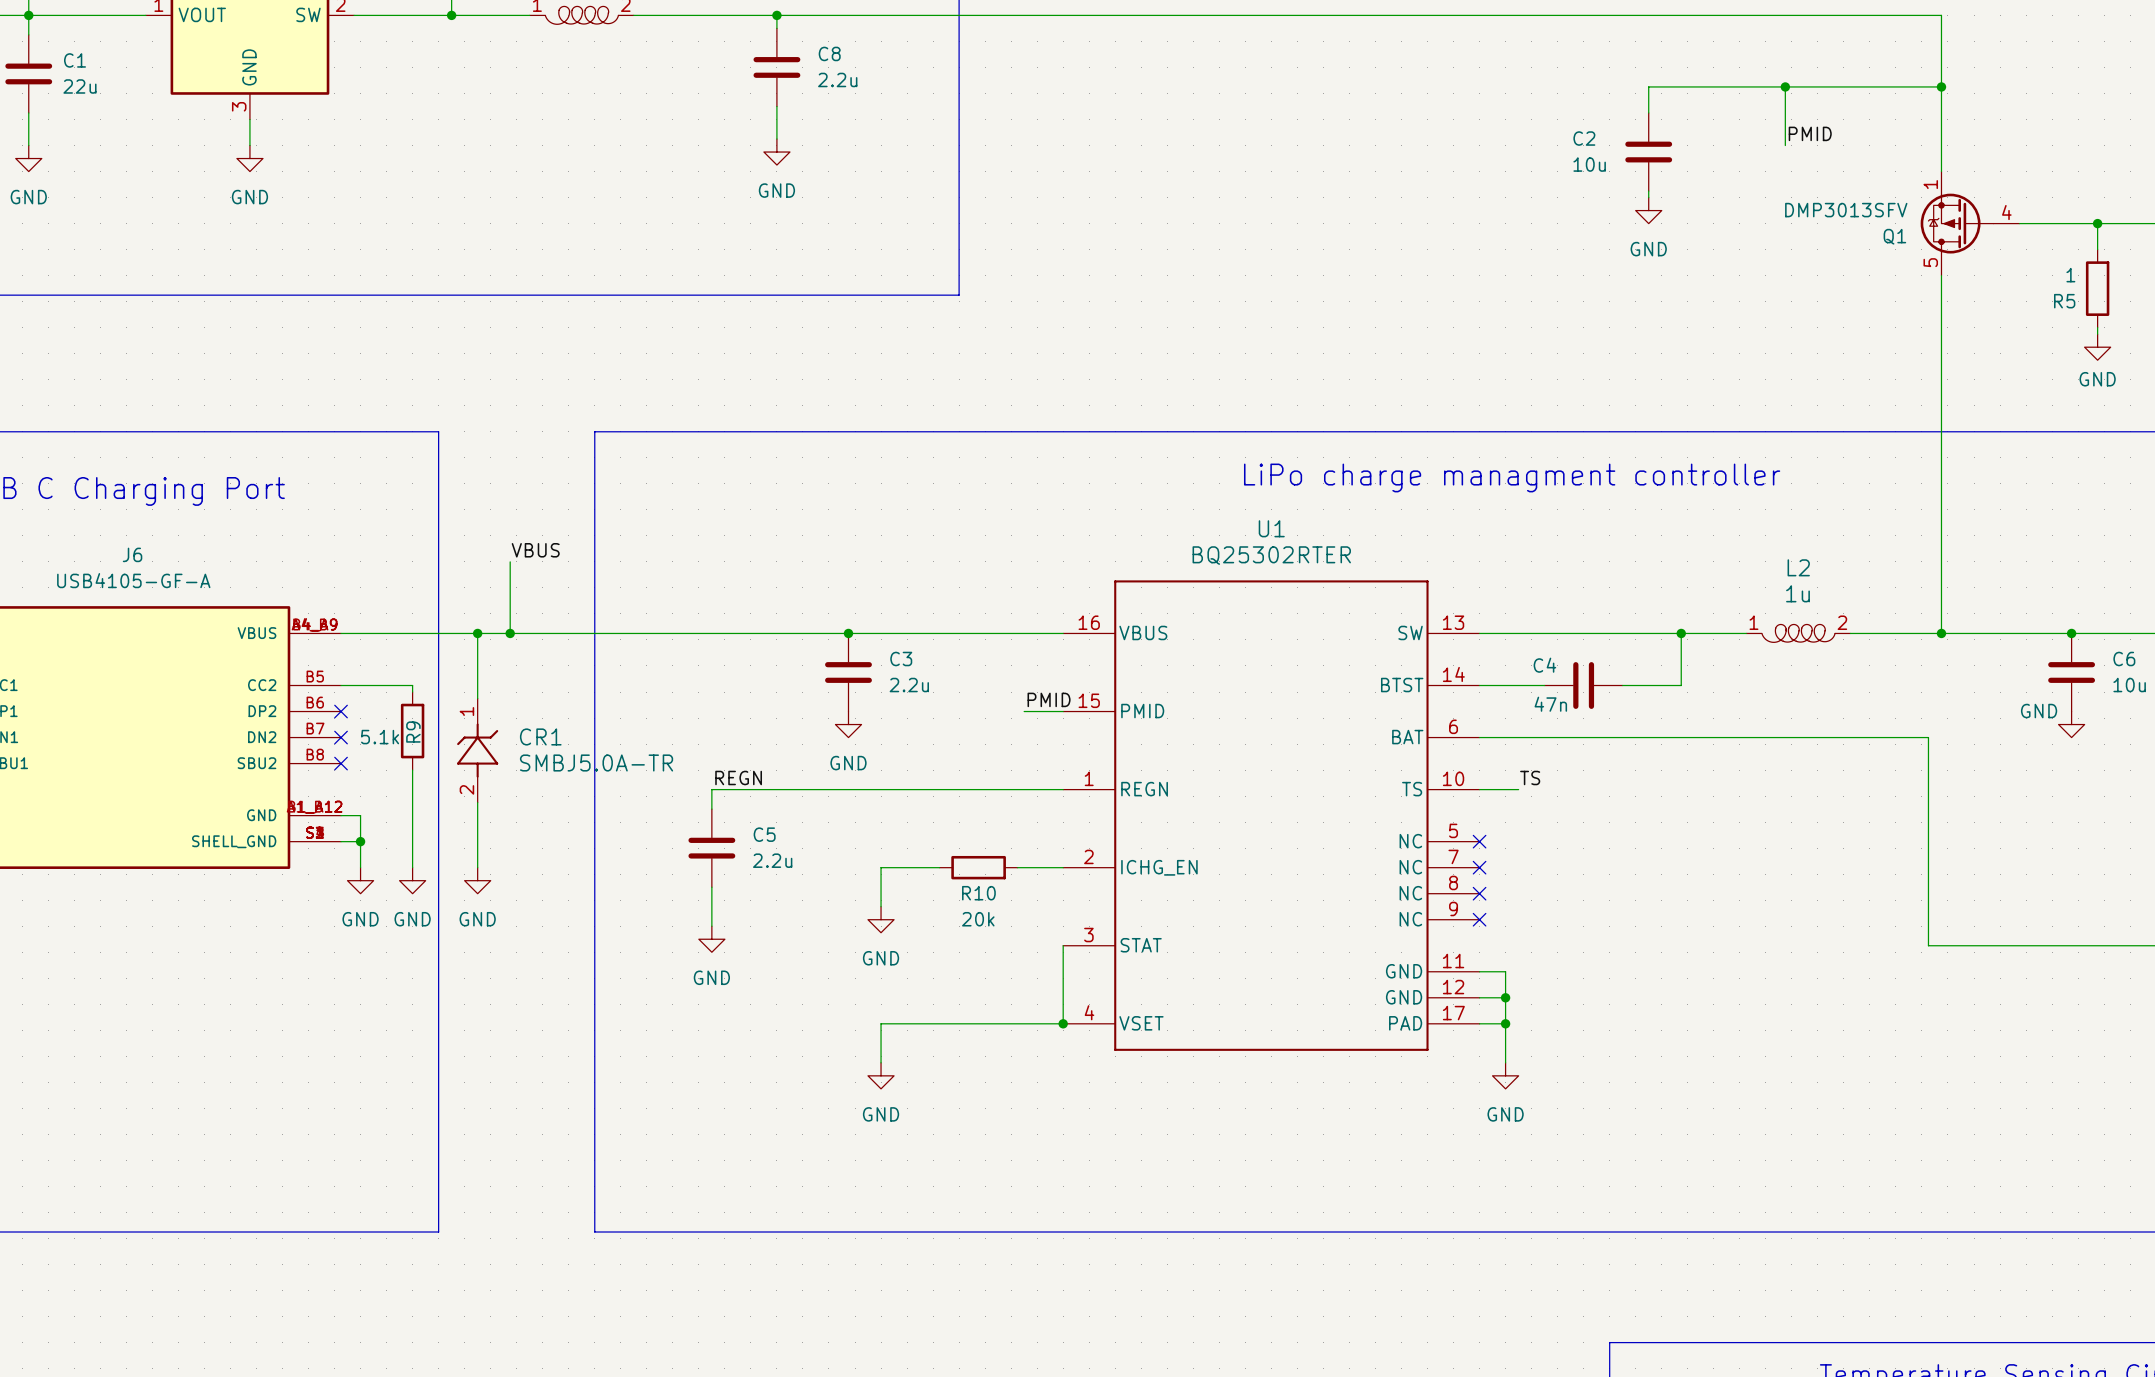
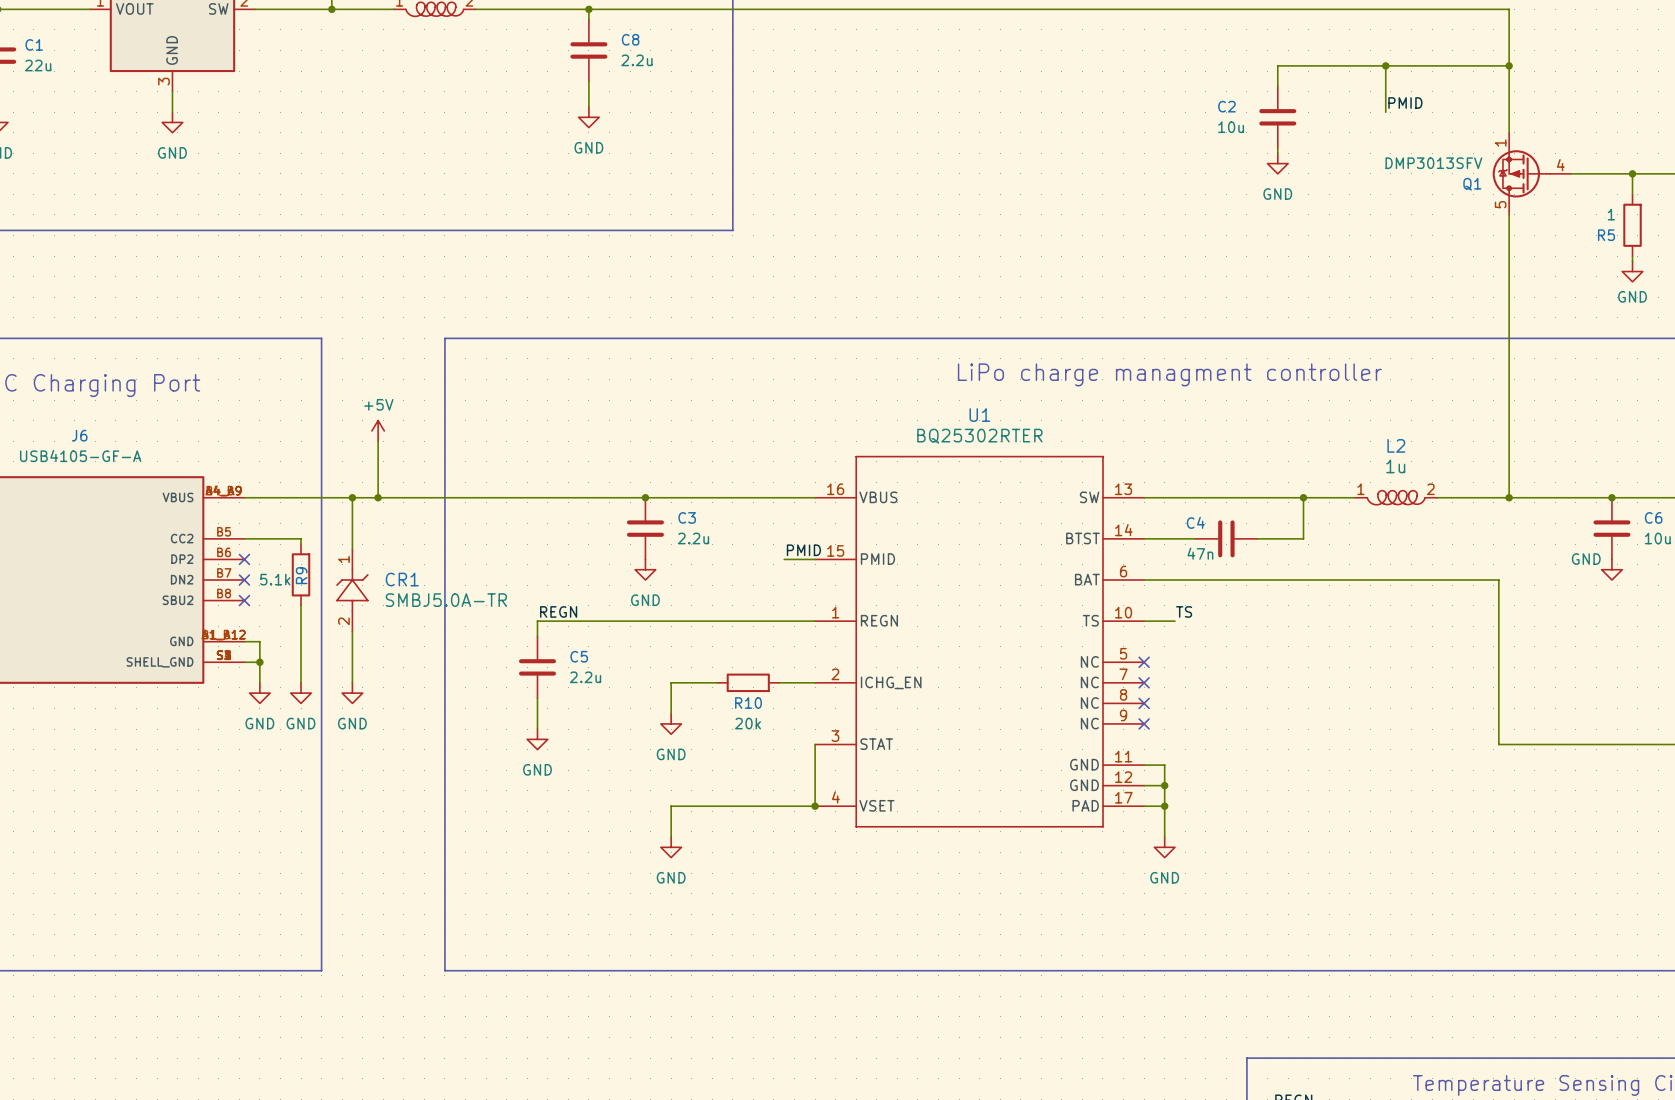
power symbol: none -> +5V (378, 430)
label: VBUS (535, 550) -> none

